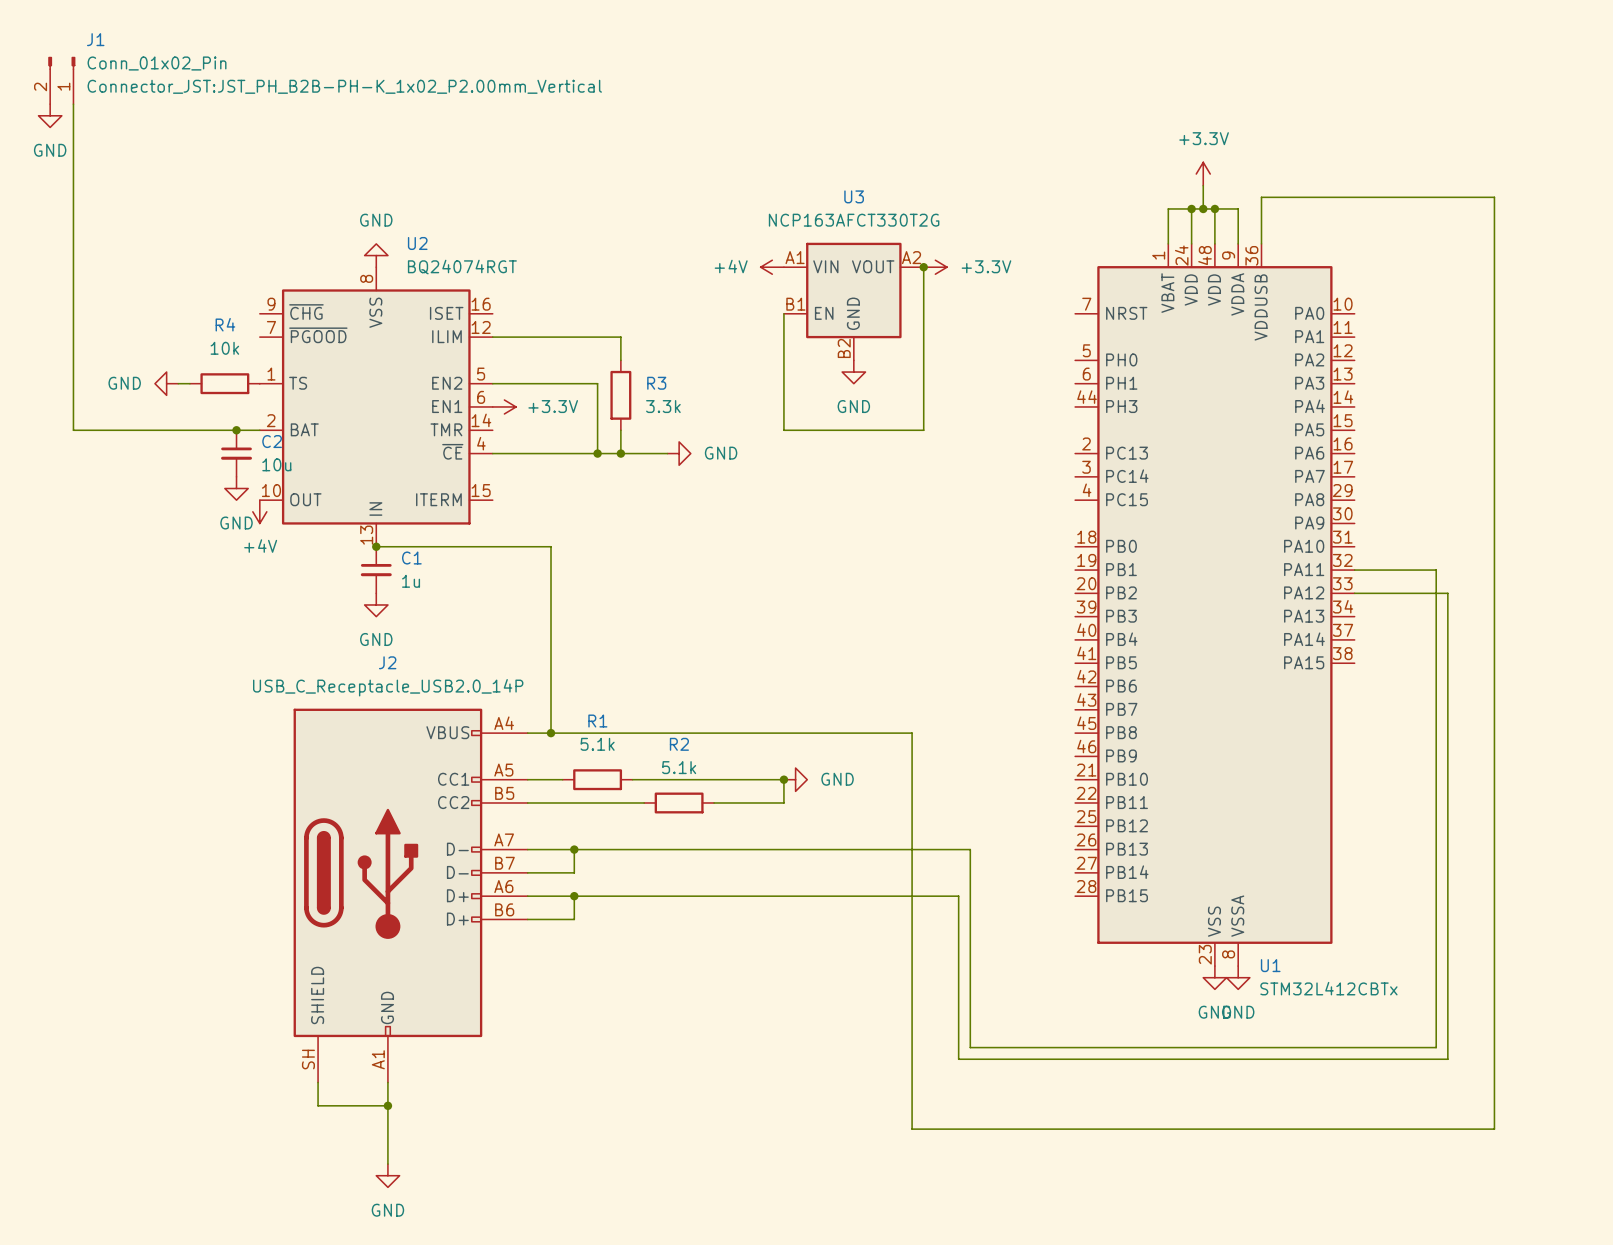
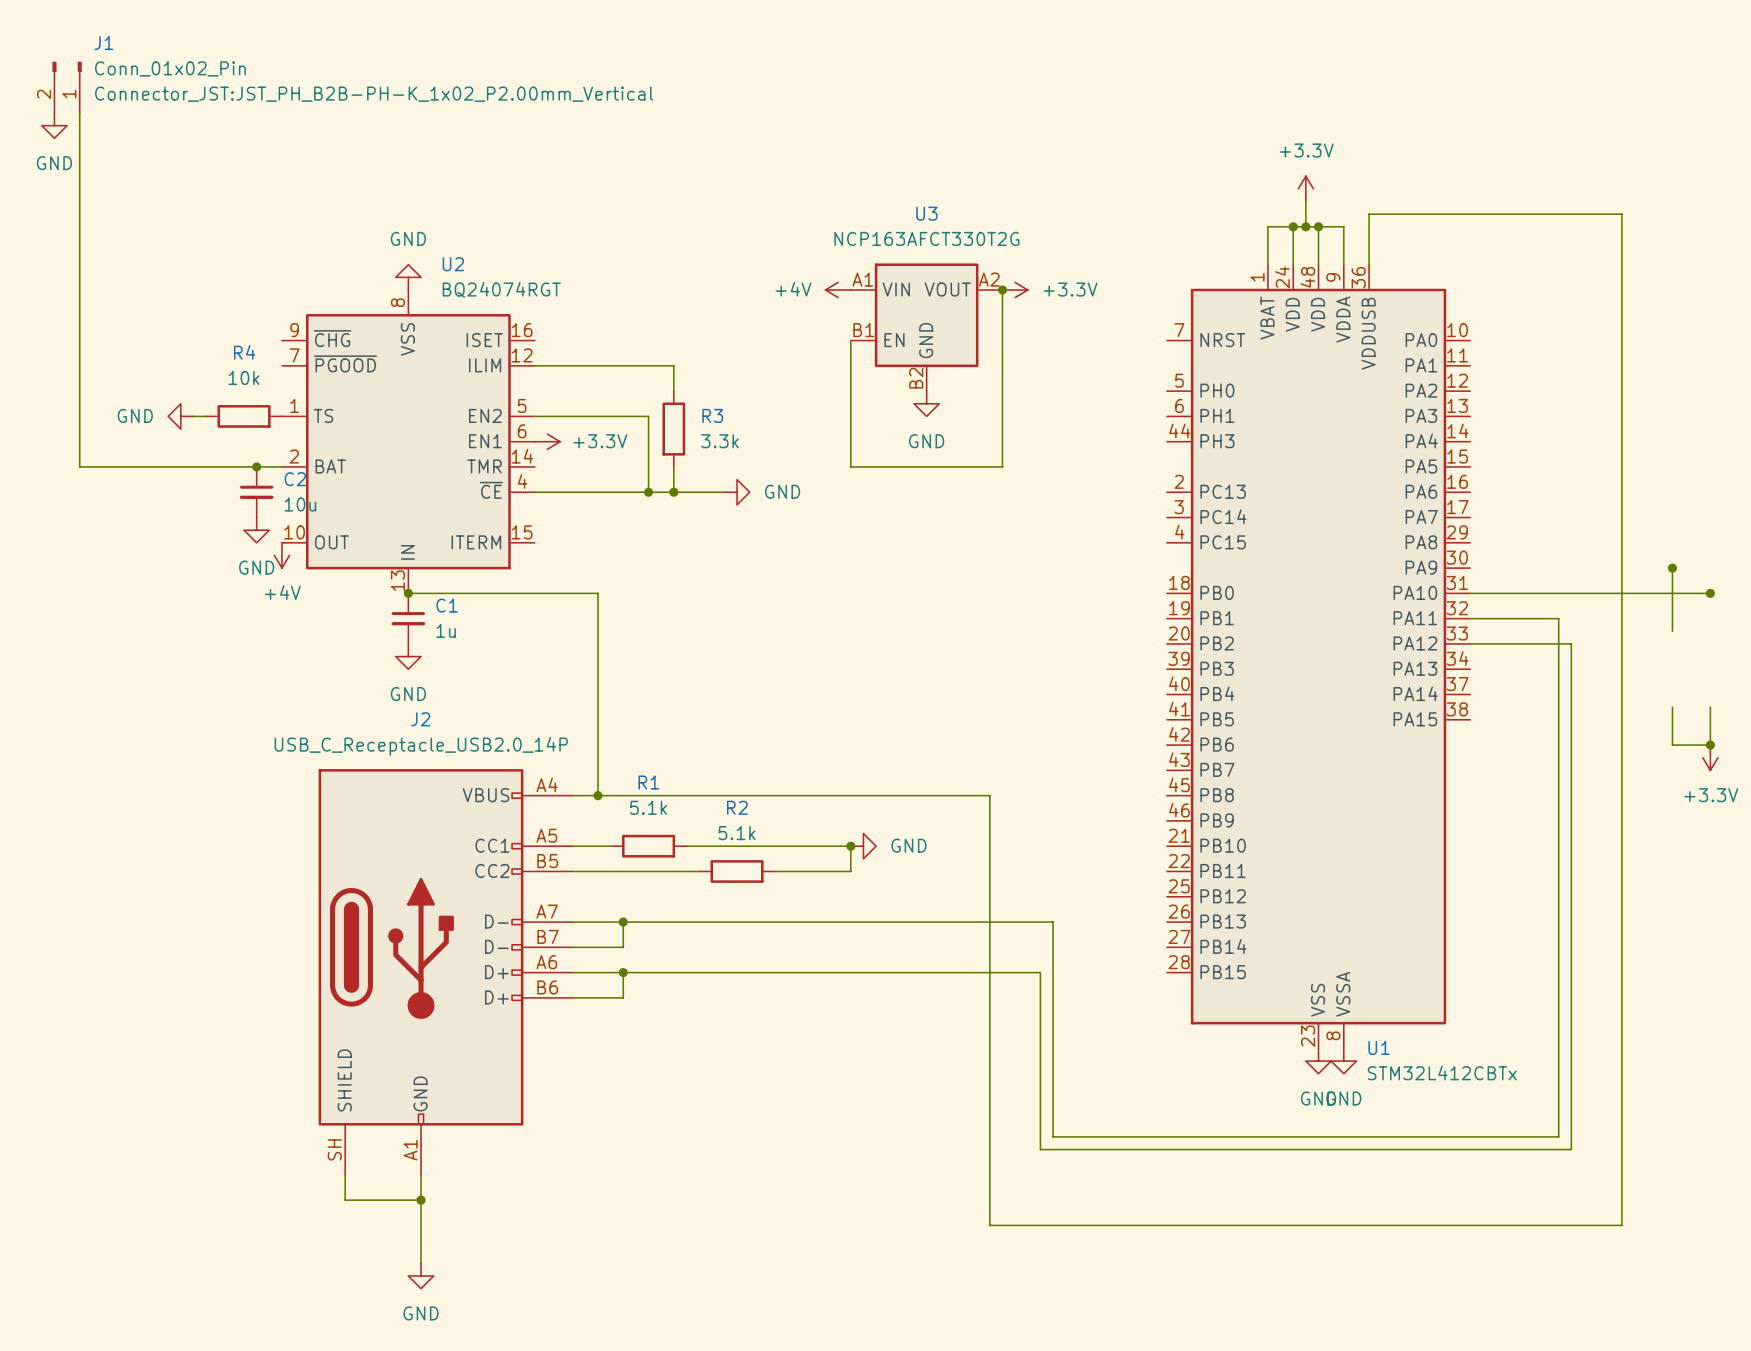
wire: none -> (1672, 568) (1672, 631)
junction: none -> (1672, 568)
wire: none -> (1470, 593) (1710, 593)
junction: none -> (1710, 593)
wire: none -> (1672, 707) (1672, 745) (1710, 745) (1710, 707)
junction: none -> (1710, 745)
power symbol: none -> +3.3V (1710, 757)

